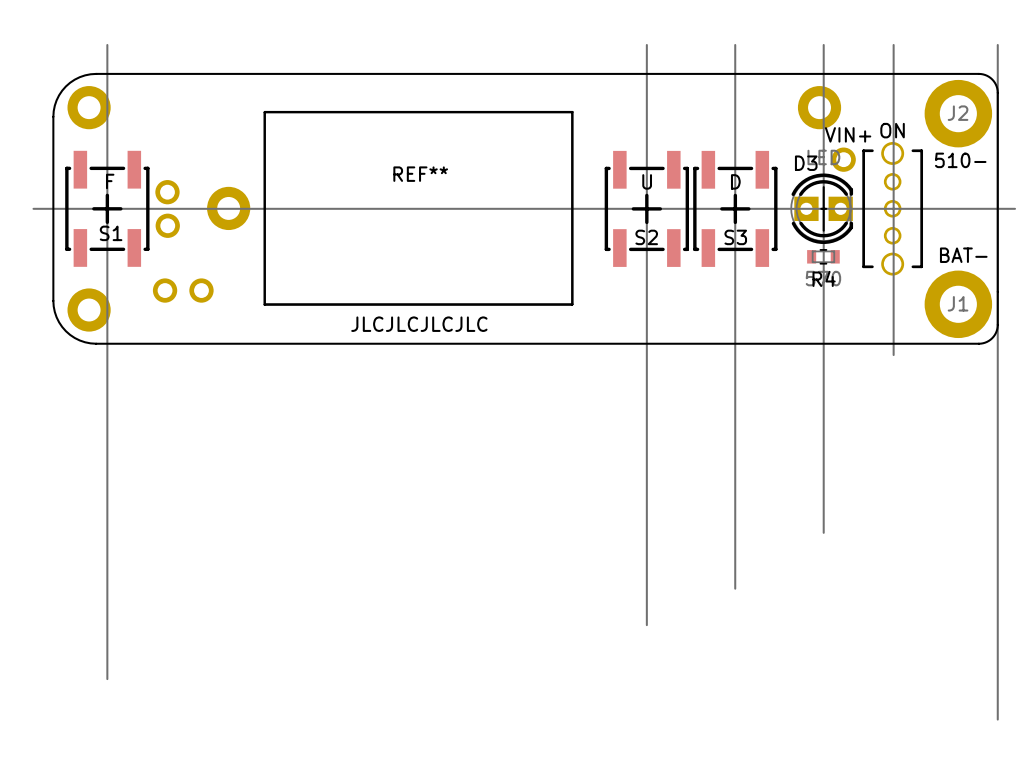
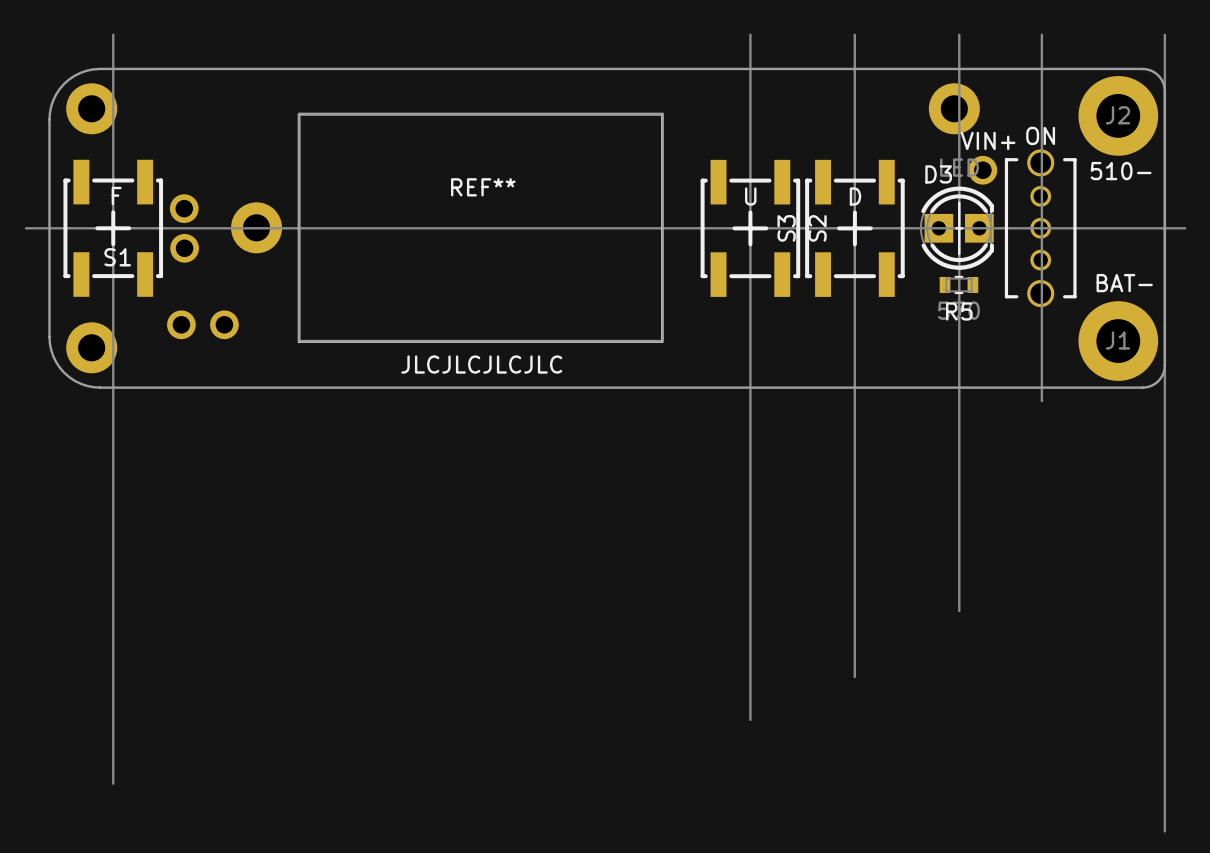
S2 name rotation: 0° (646, 237) -> 90° counterclockwise (817, 228)
S2 name position: S2 (646, 237) -> S2 (817, 228)
S3 name rotation: 0° (735, 237) -> 90° counterclockwise (786, 228)
S3 name position: S3 (735, 237) -> S3 (786, 228)
R4 name: R4 (824, 278) -> R5 (959, 311)

